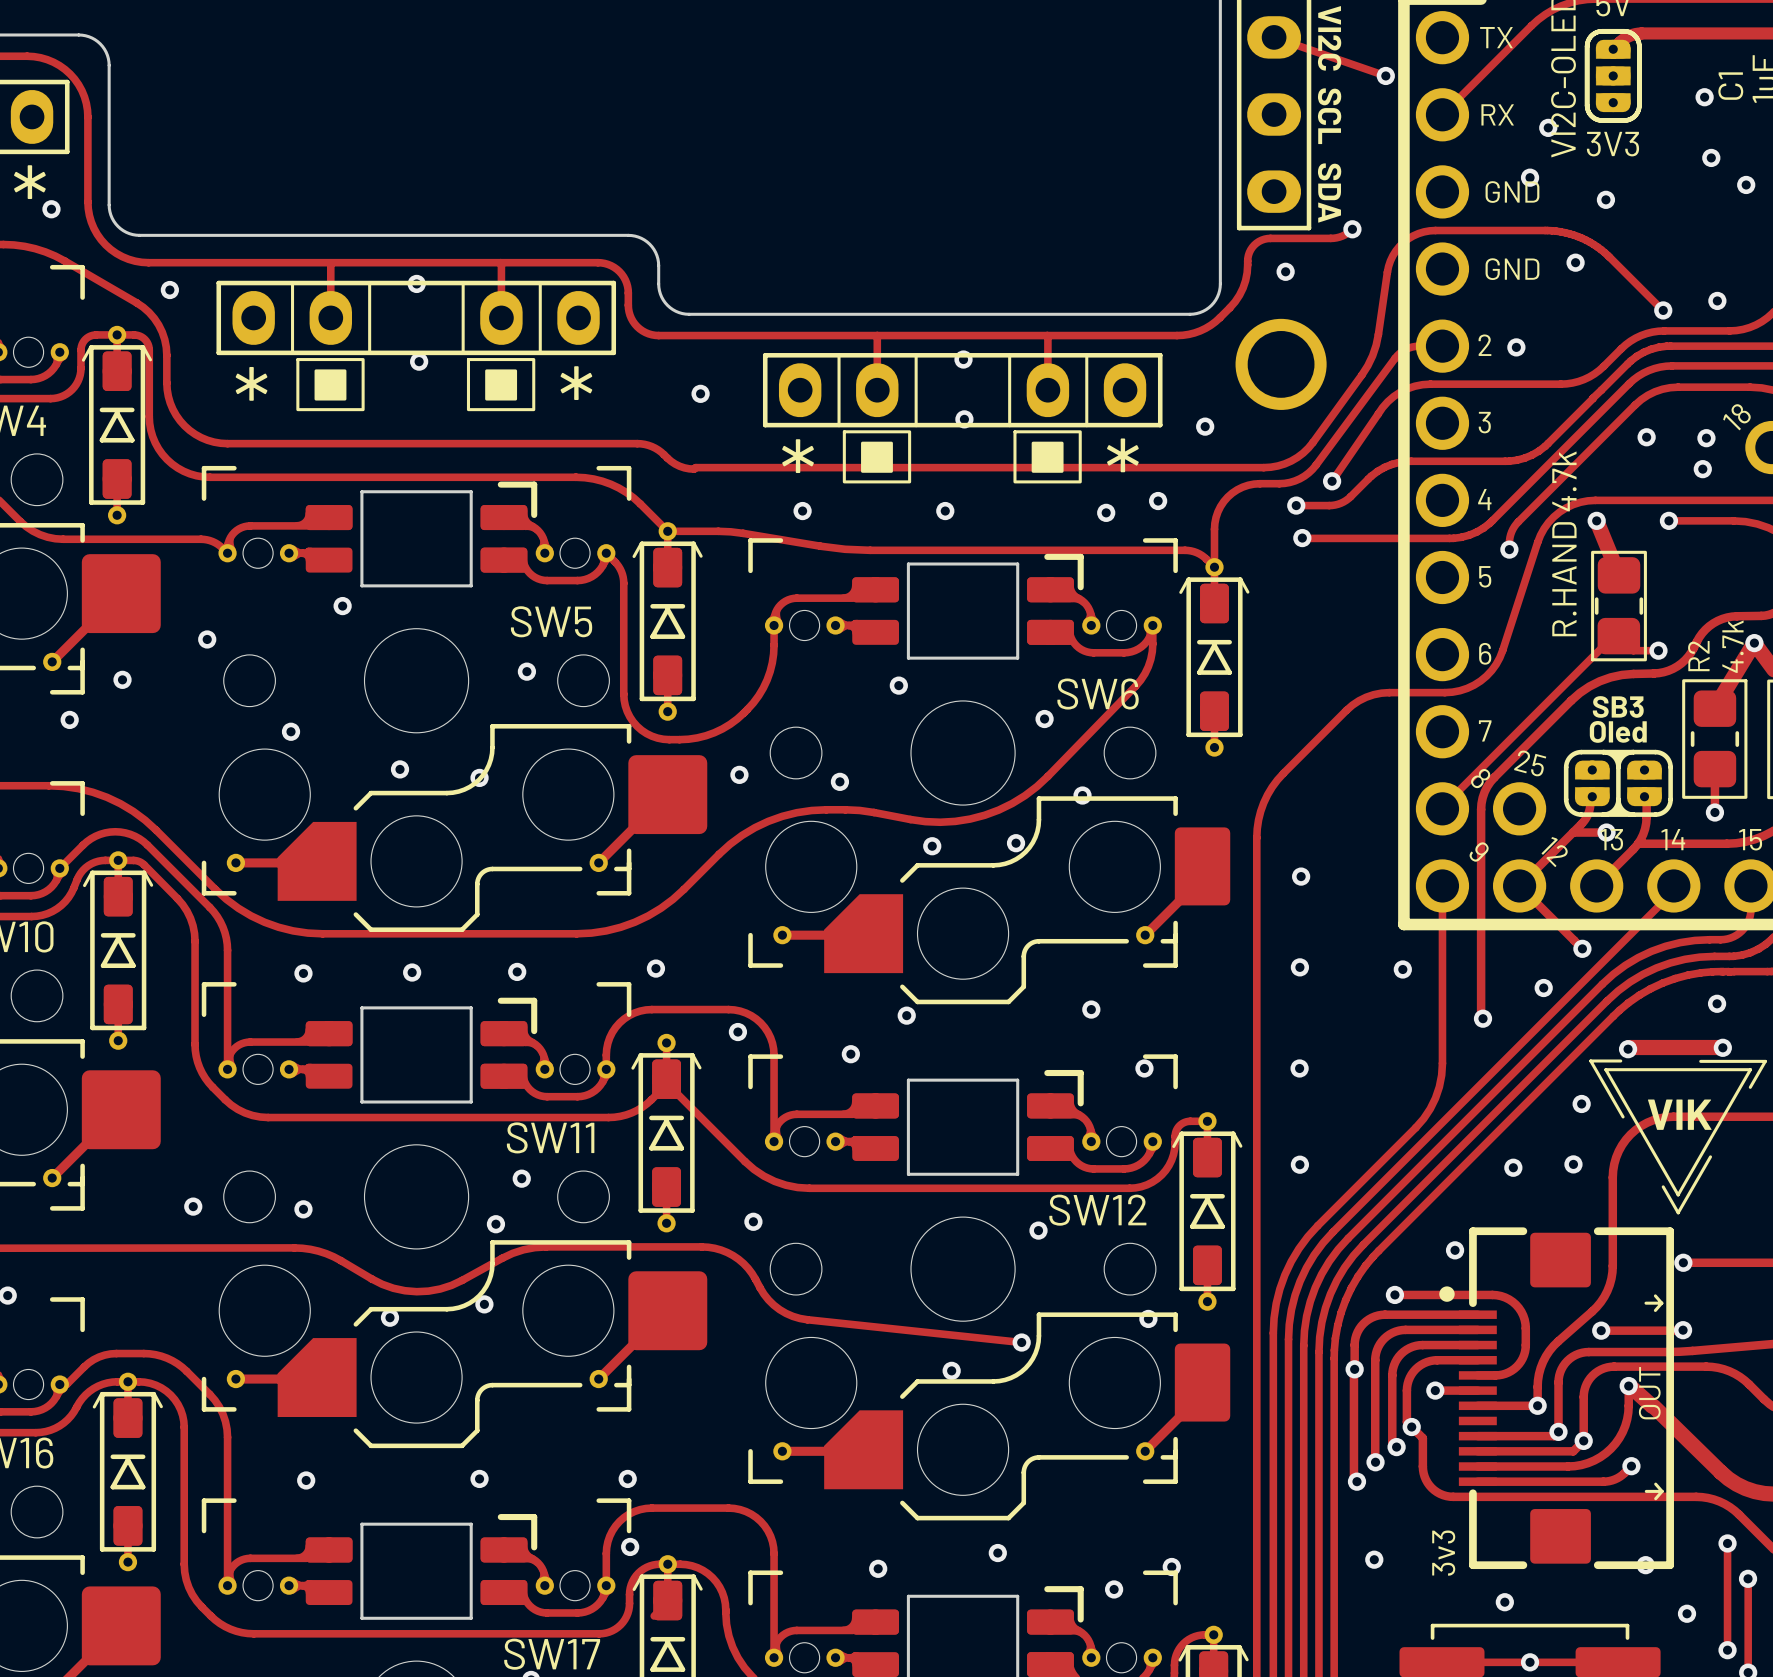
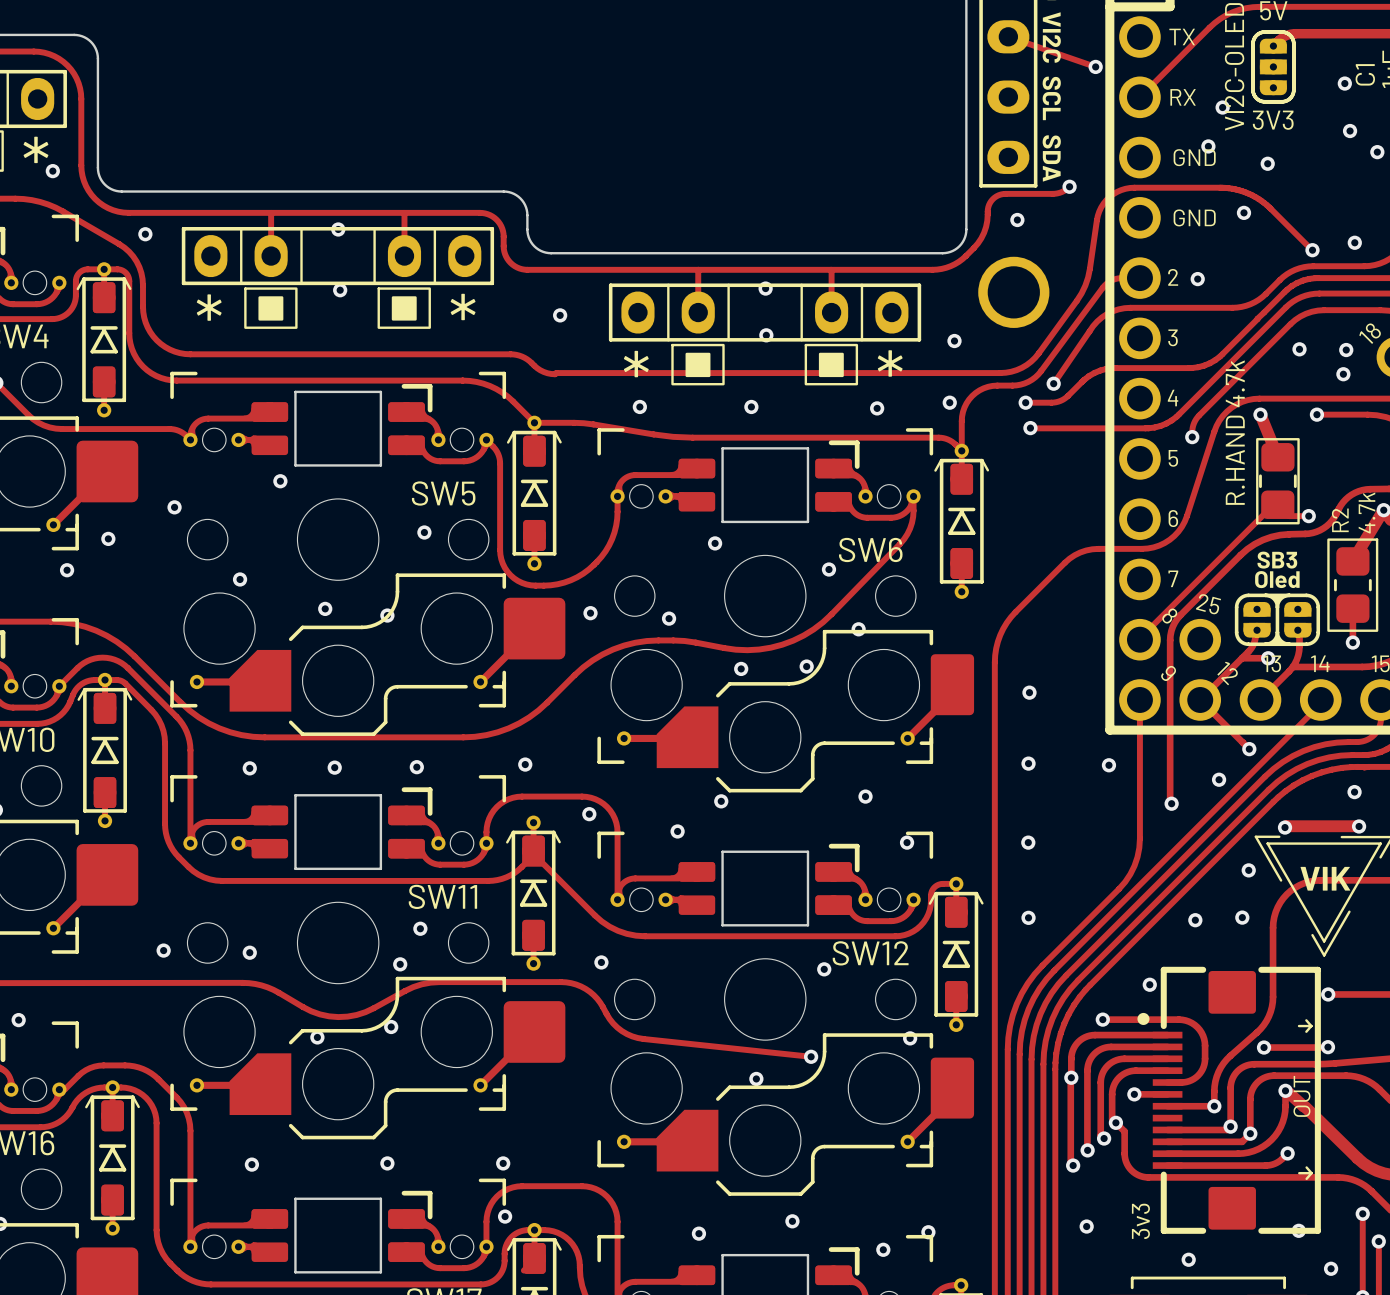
via position: (1158, 501) -> (949, 402)

